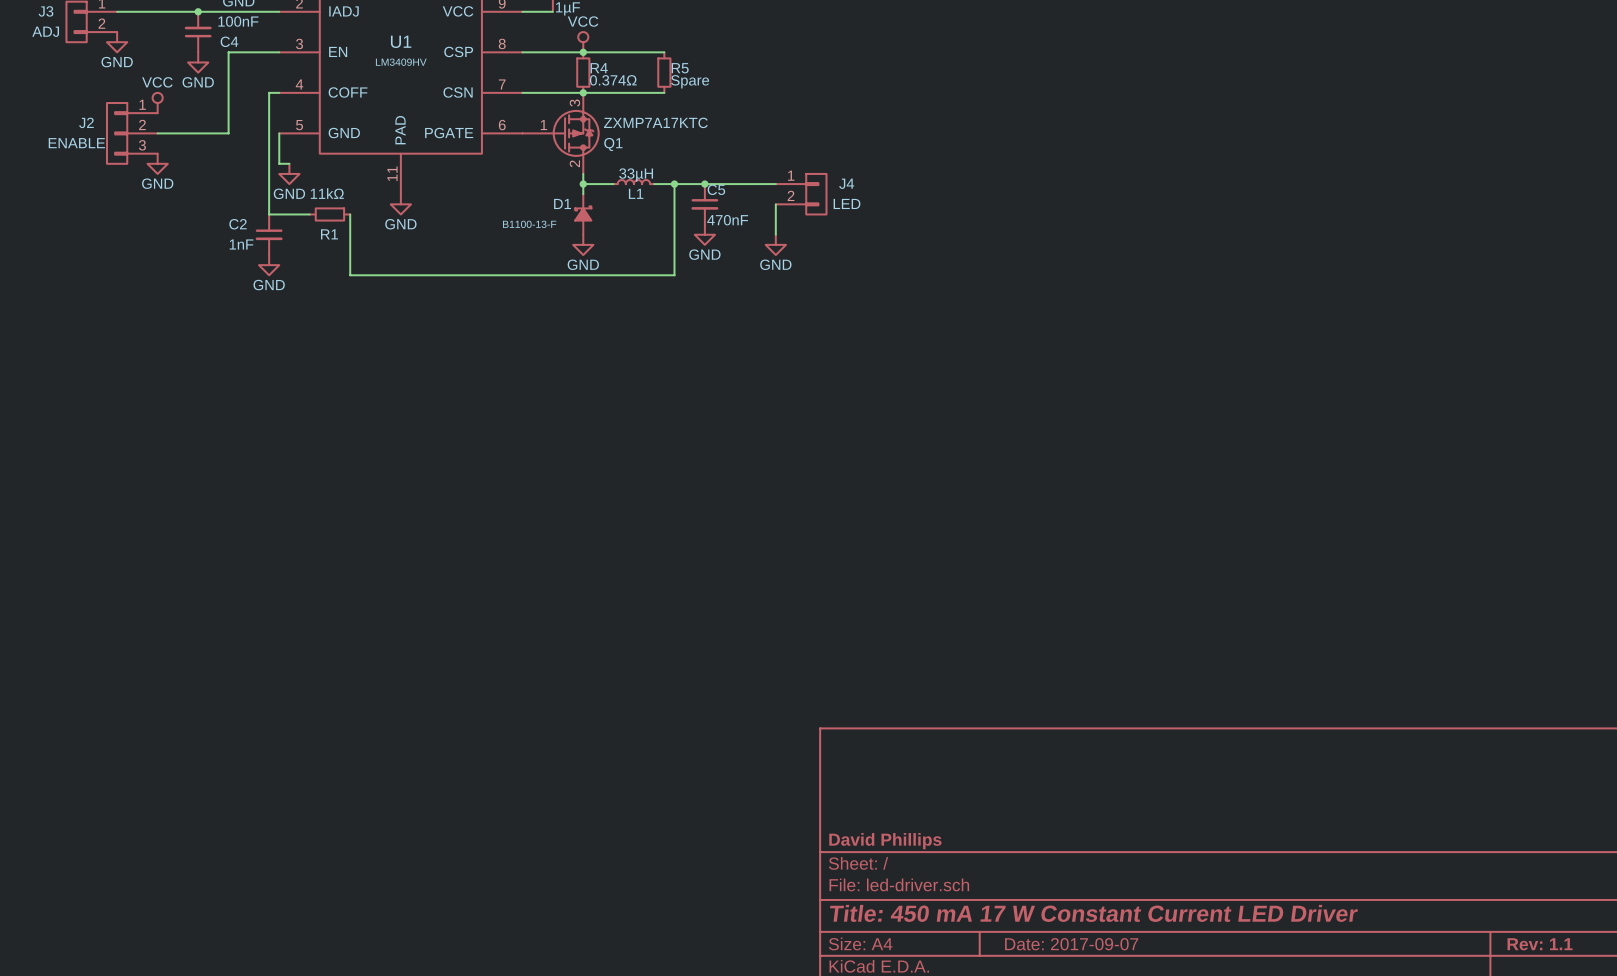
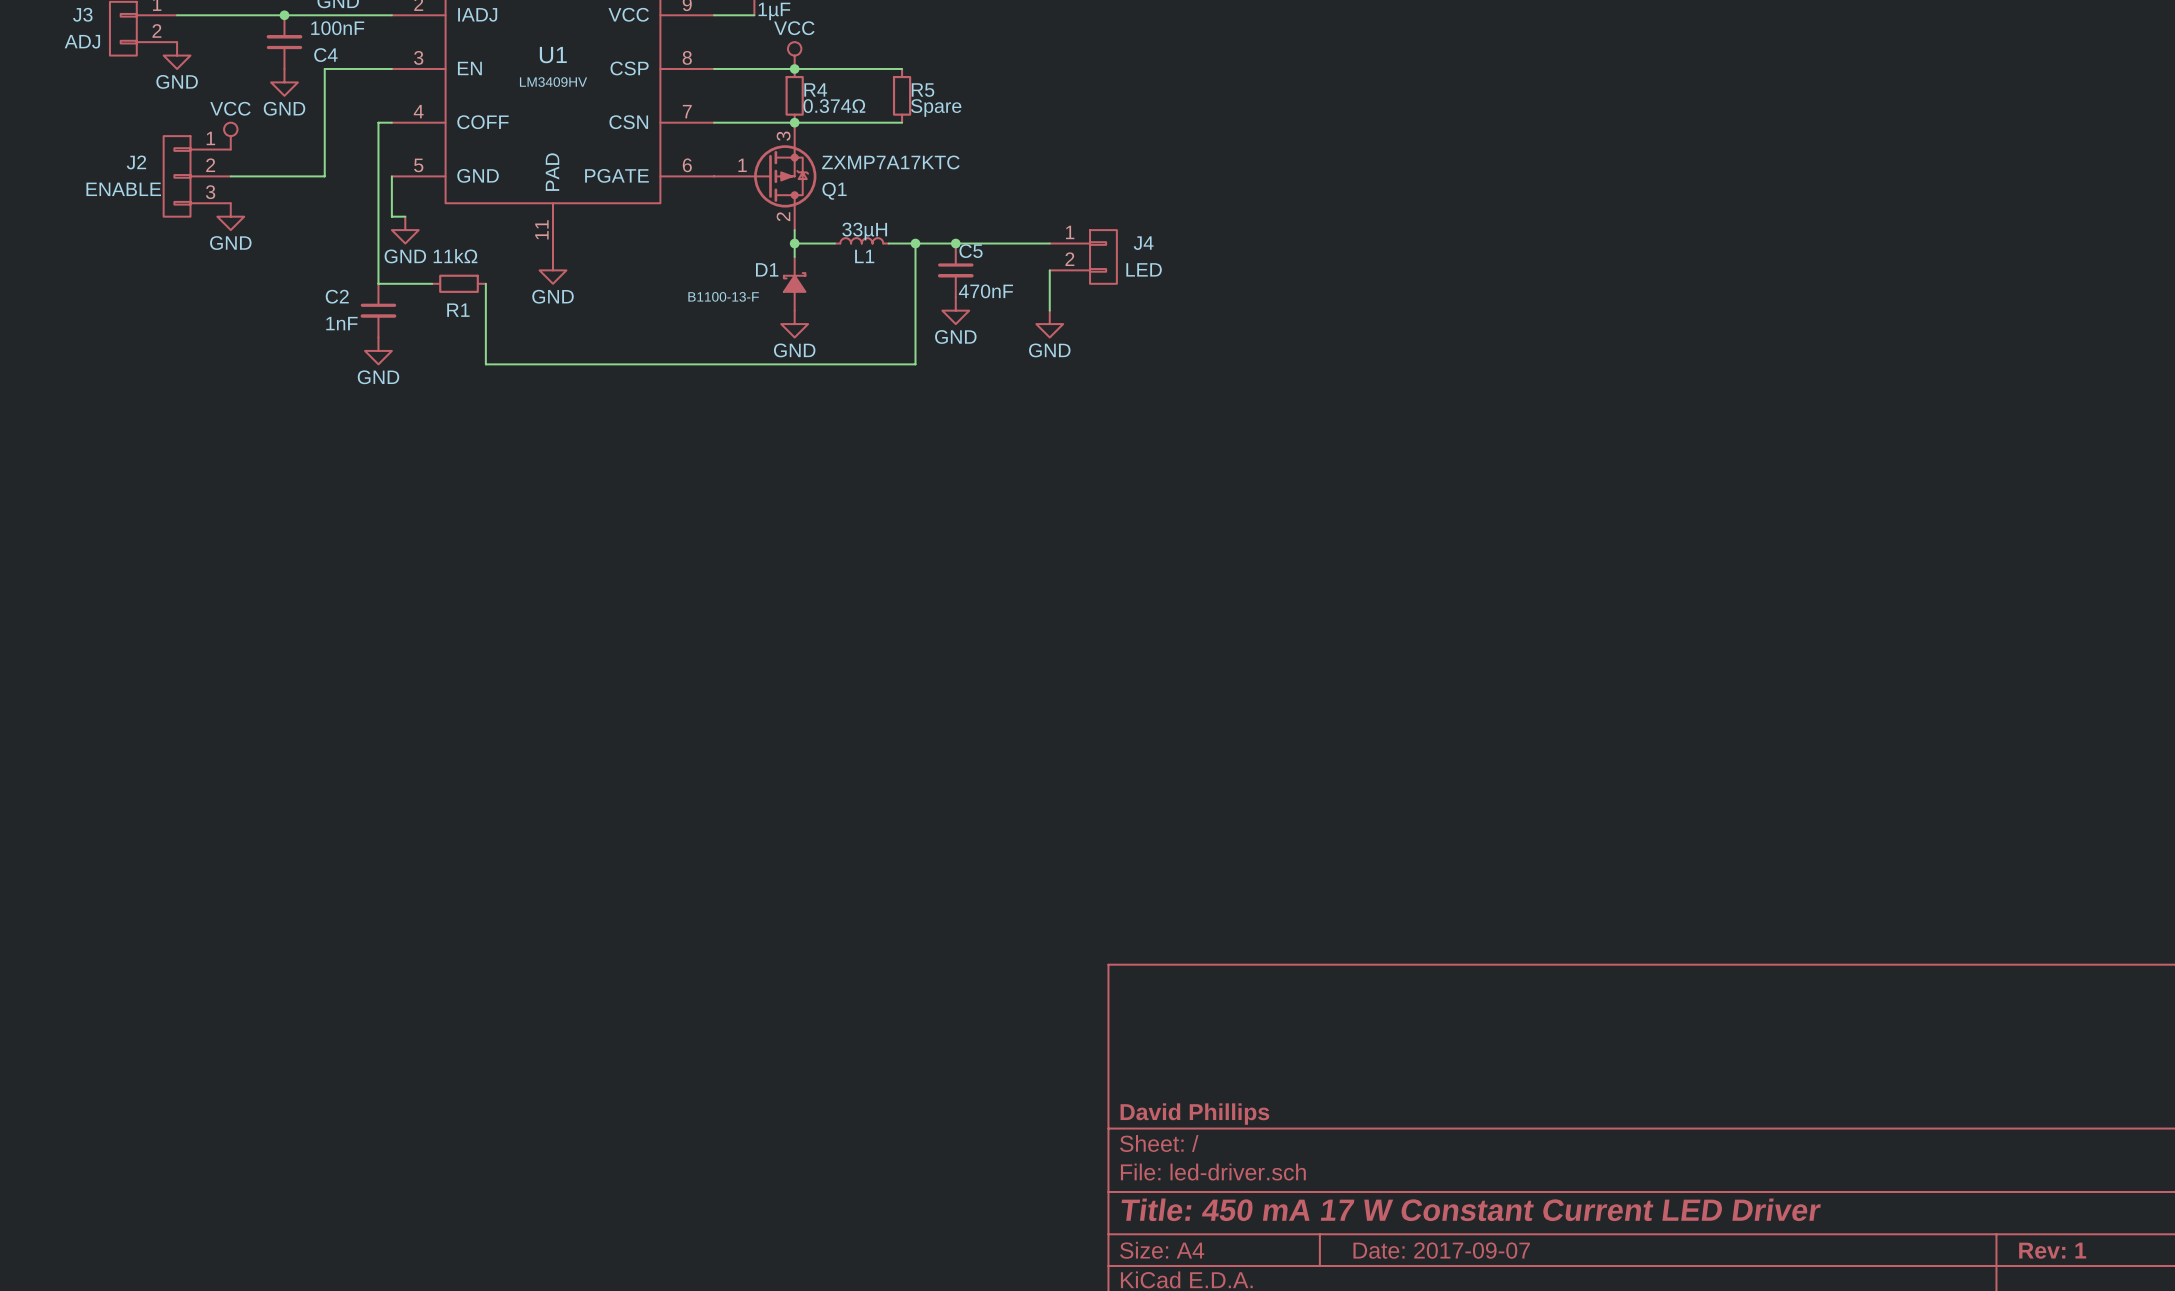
title block: Rev: 1.1 (1540, 944) -> Rev: 1 (2052, 1250)

